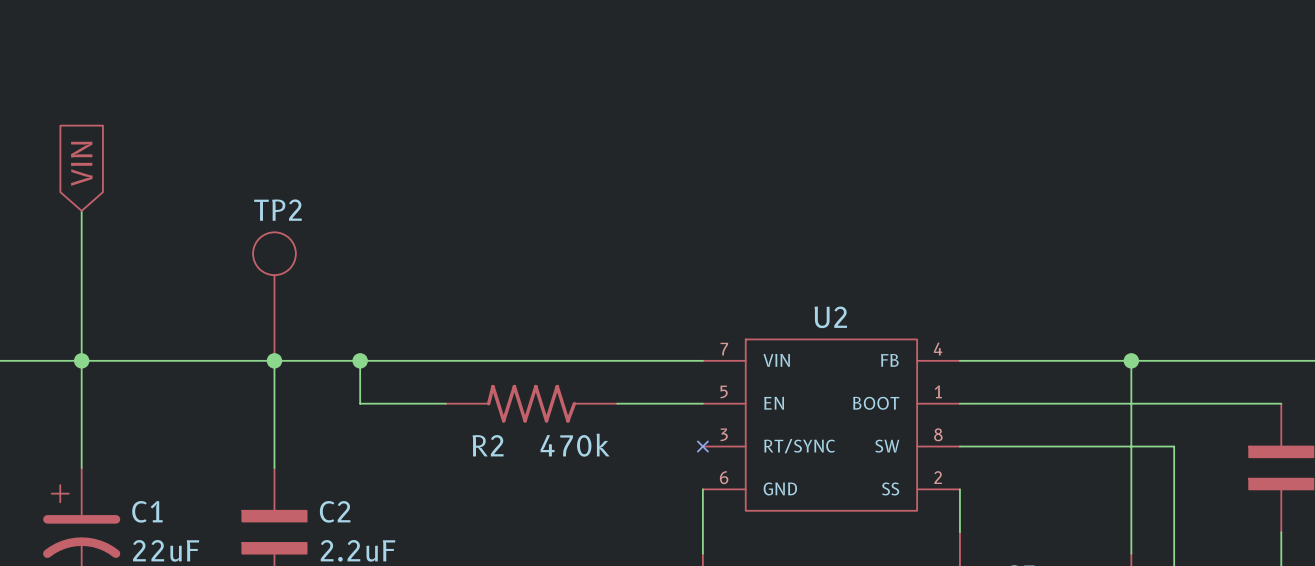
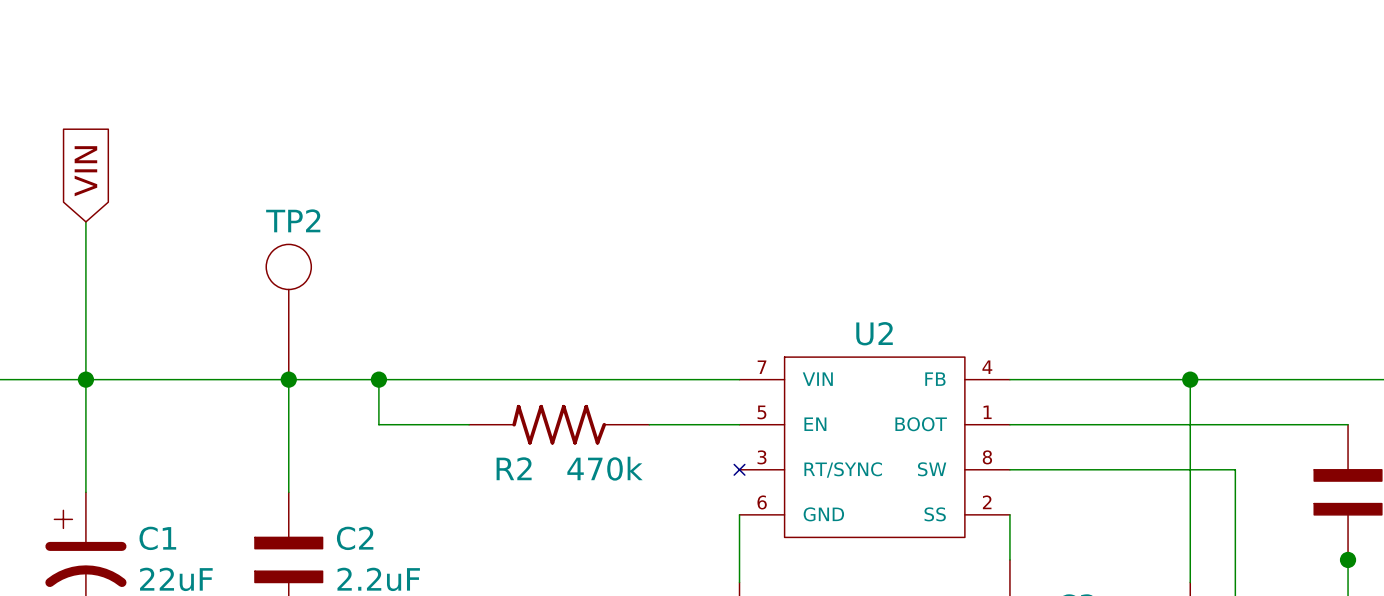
junction: none -> (1348, 559)

